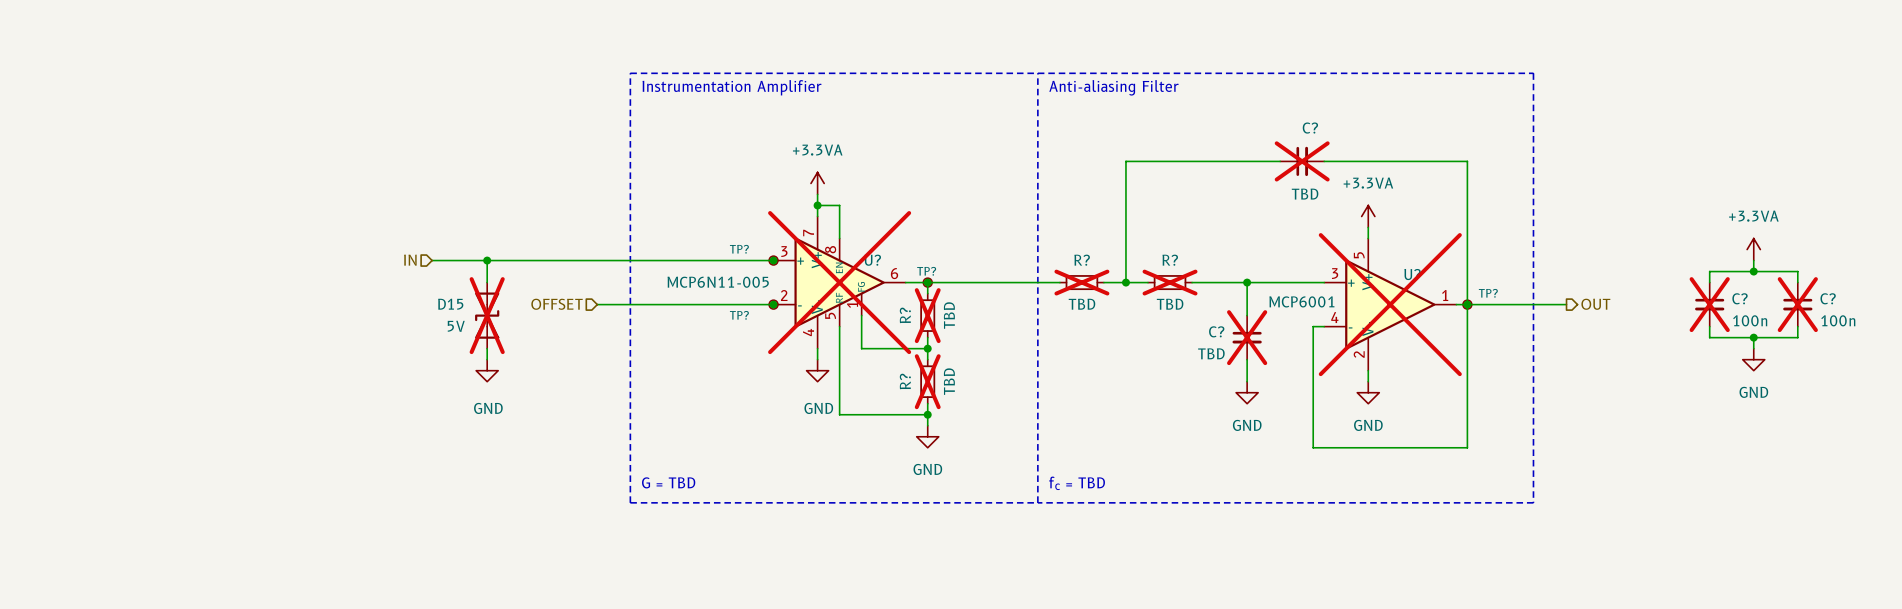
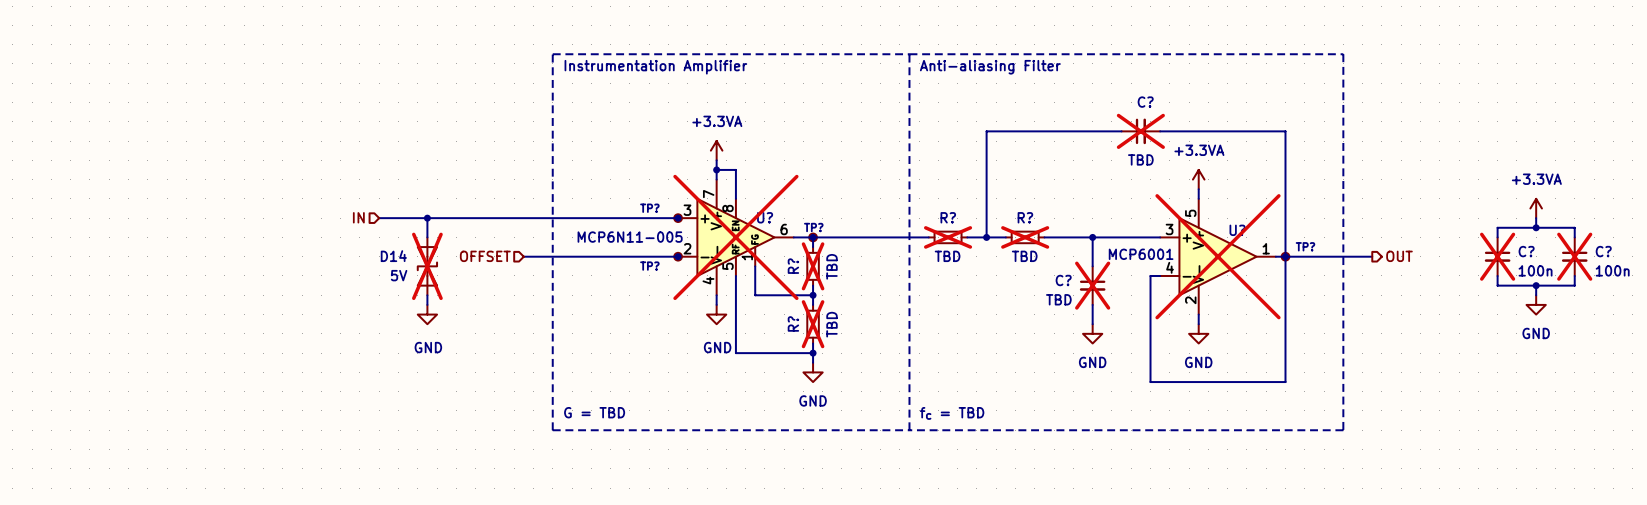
D15 name: D15 (450, 304) -> D14 (393, 256)

